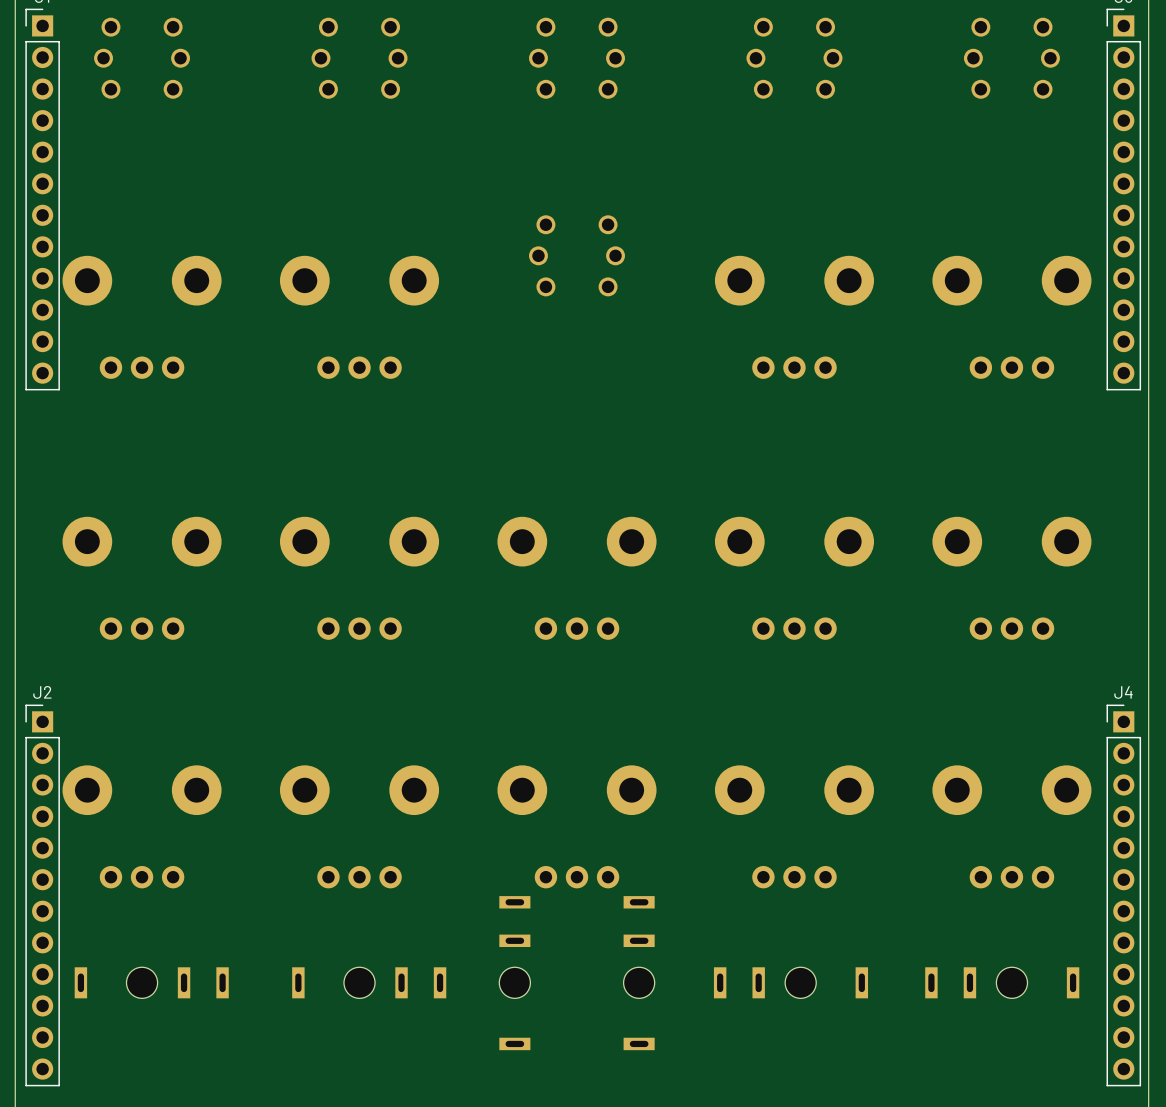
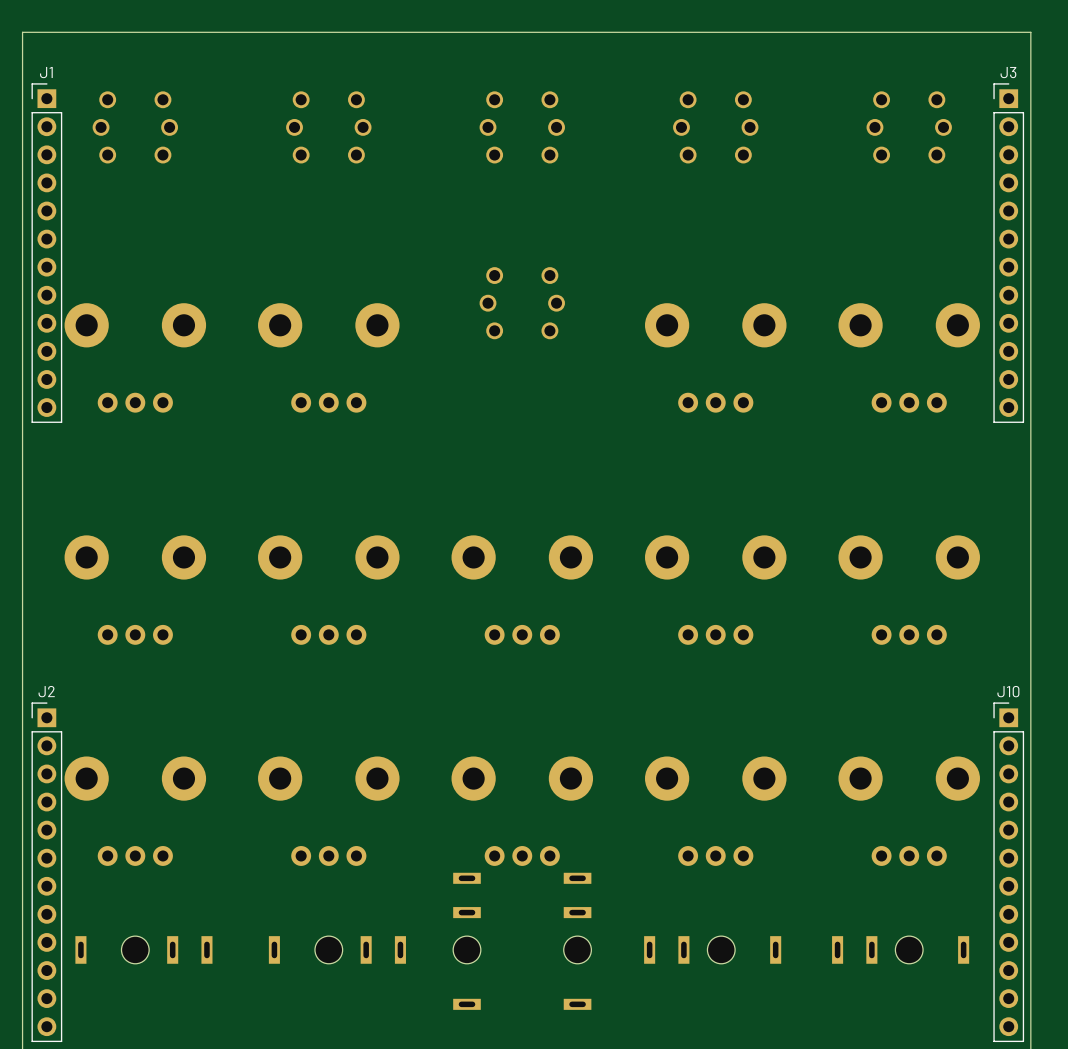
J4 name: J4 (1123, 692) -> J10 (1008, 691)

